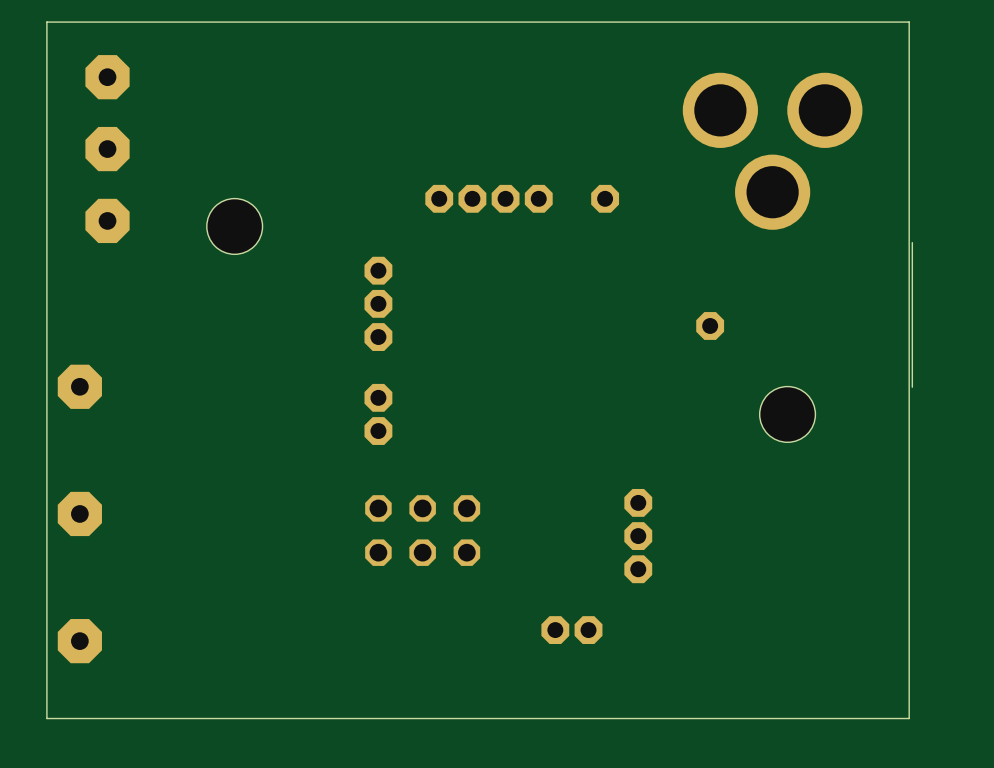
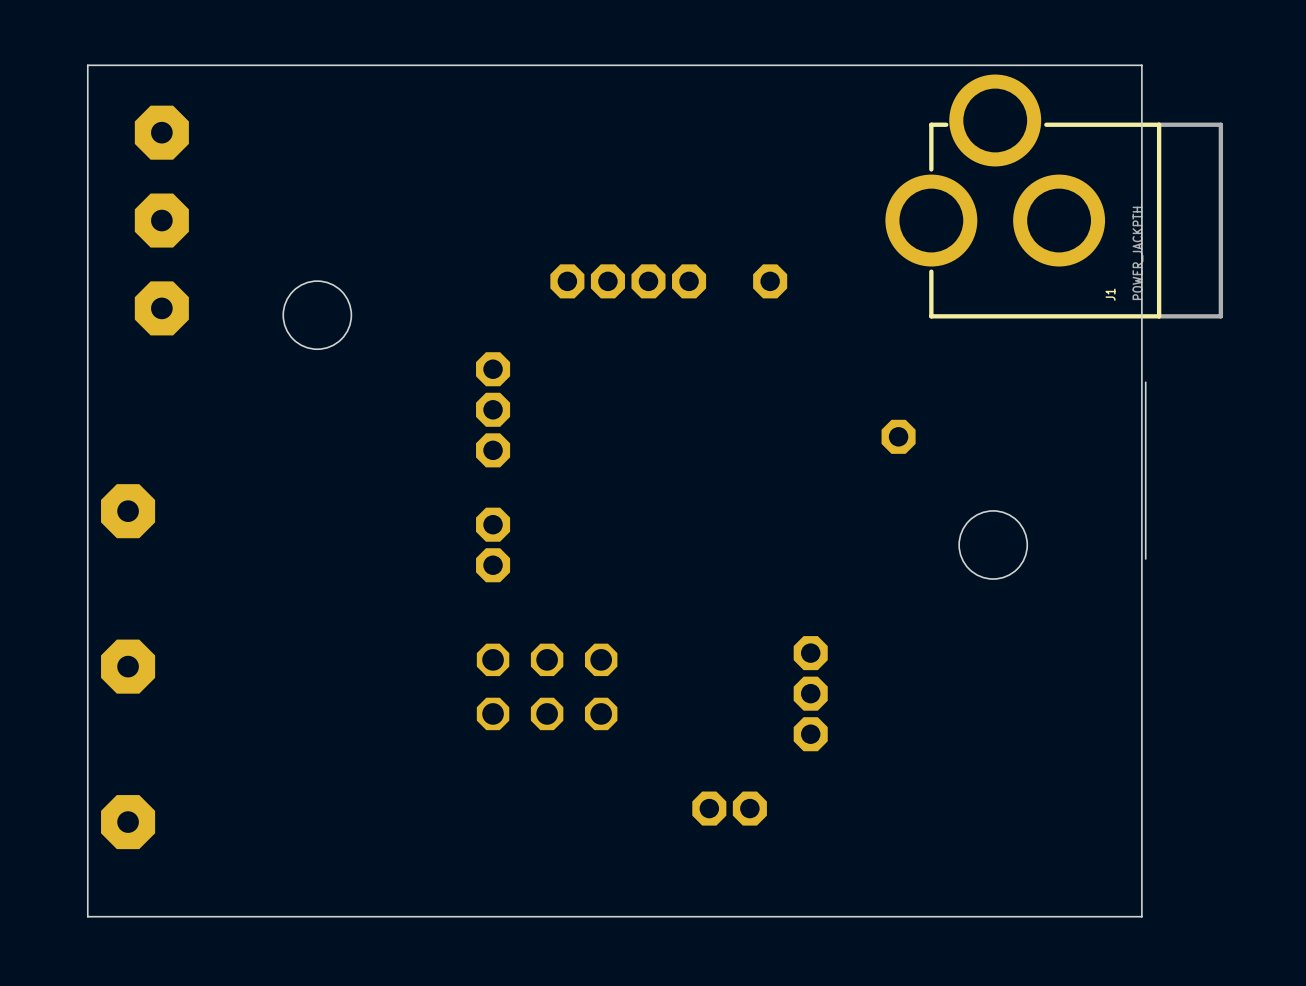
J1 side: top (772, 151) -> bottom (1054, 196)
part position: (912, 314) -> (1145, 470)

